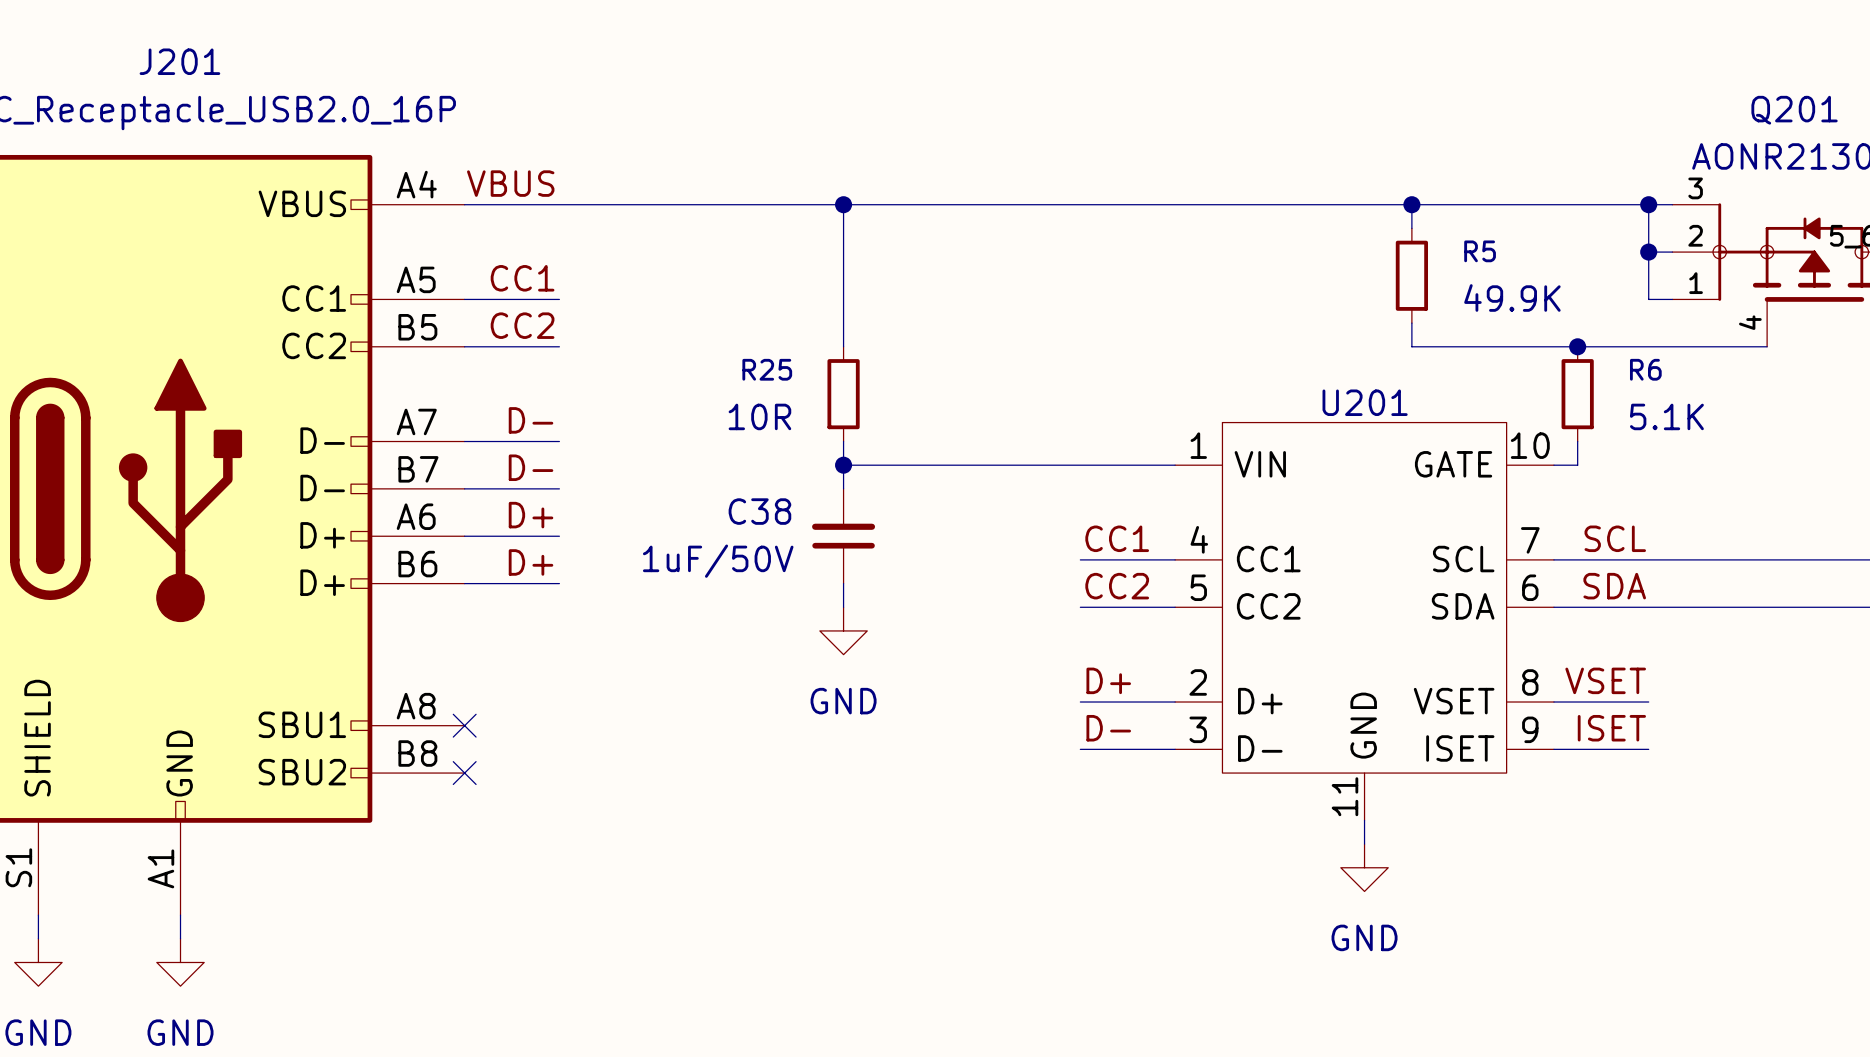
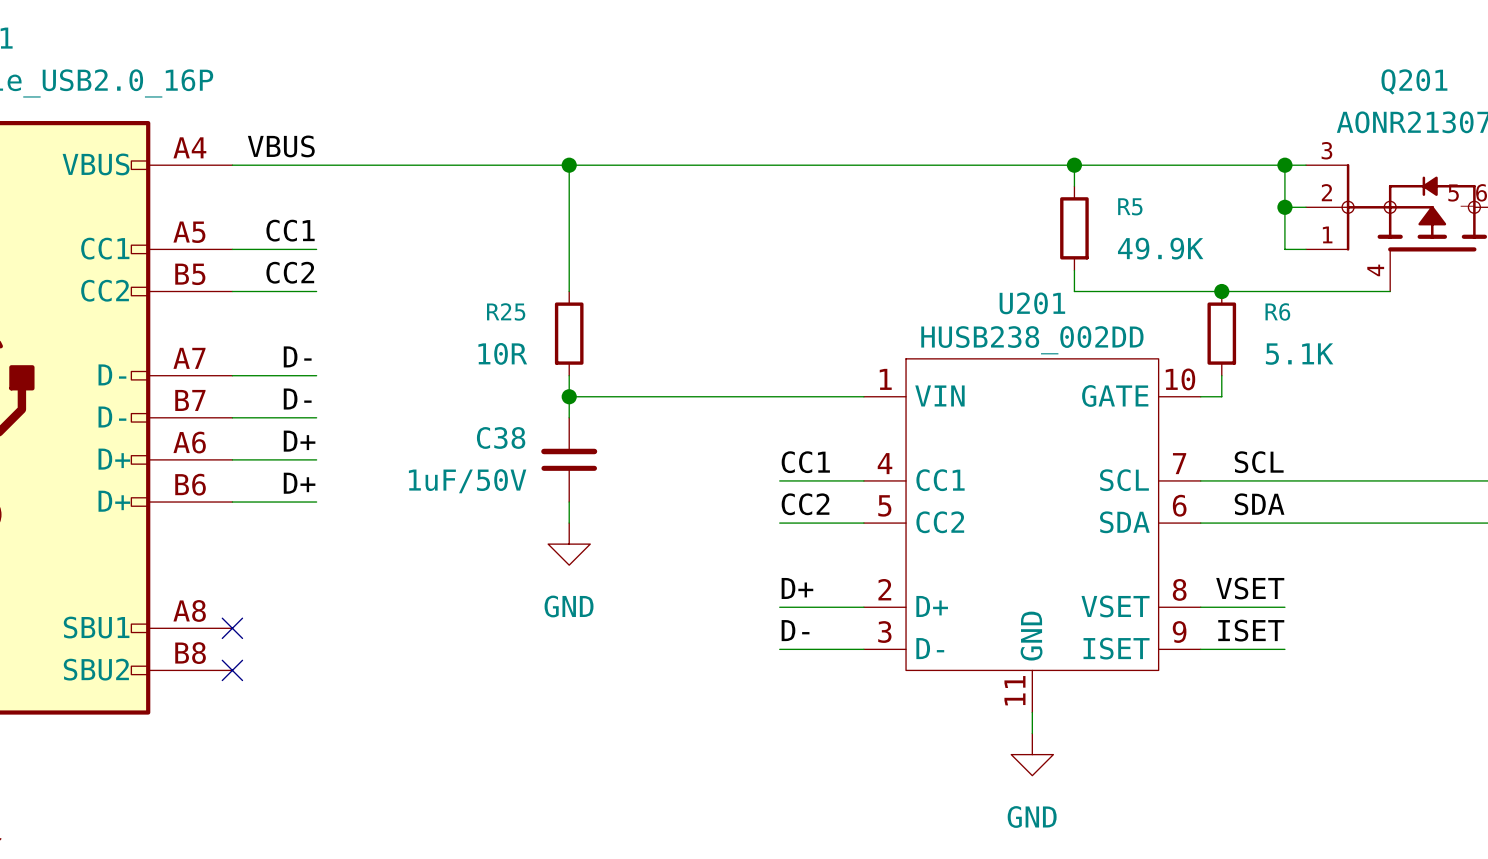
U201 value: none -> HUSB238_002DD (1032, 340)
U201 name position: U201 (1365, 402) -> U201 (1032, 303)

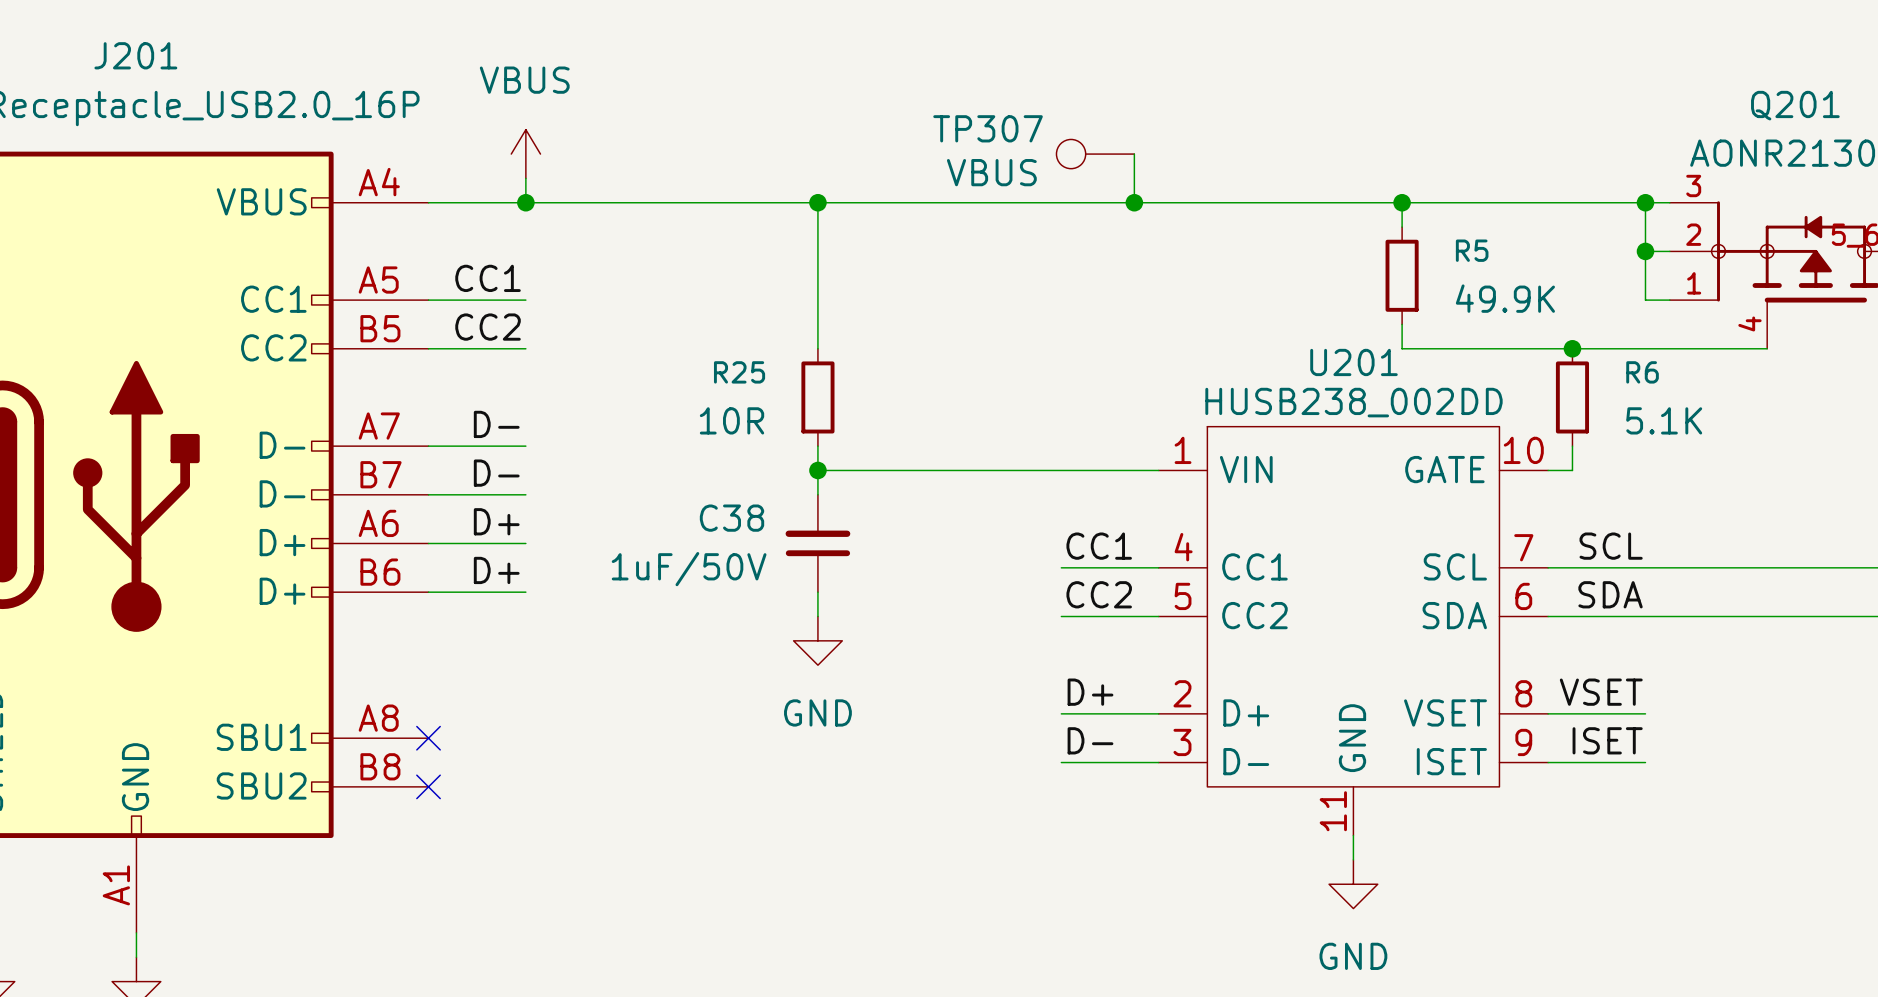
power symbol: none -> VBUS (525, 154)
TP307: none -> VBUS (1095, 154)
wire: none -> (1134, 154) (1134, 202)
wire: none -> (525, 178) (525, 202)
label: VBUS (281, 146) -> none
junction: none -> (525, 202)
junction: none -> (1134, 202)

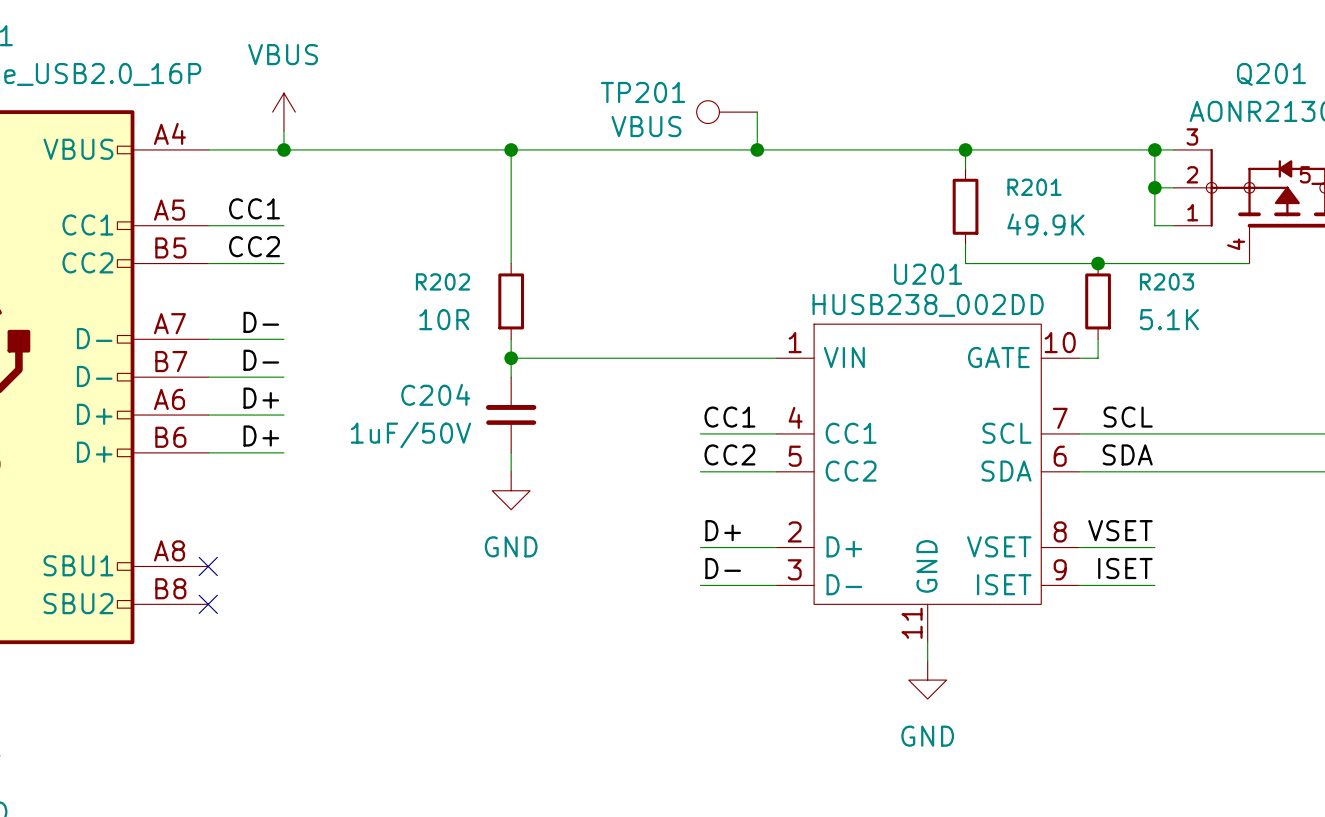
TP307 name: TP307 (988, 128) -> TP201 (643, 92)
R5 name: R5 (1472, 250) -> R201 (1034, 187)
R25 name: R25 (739, 372) -> R202 (442, 281)
R6 name: R6 (1642, 372) -> R203 (1166, 281)
C38 name: C38 (732, 518) -> C204 (435, 394)

